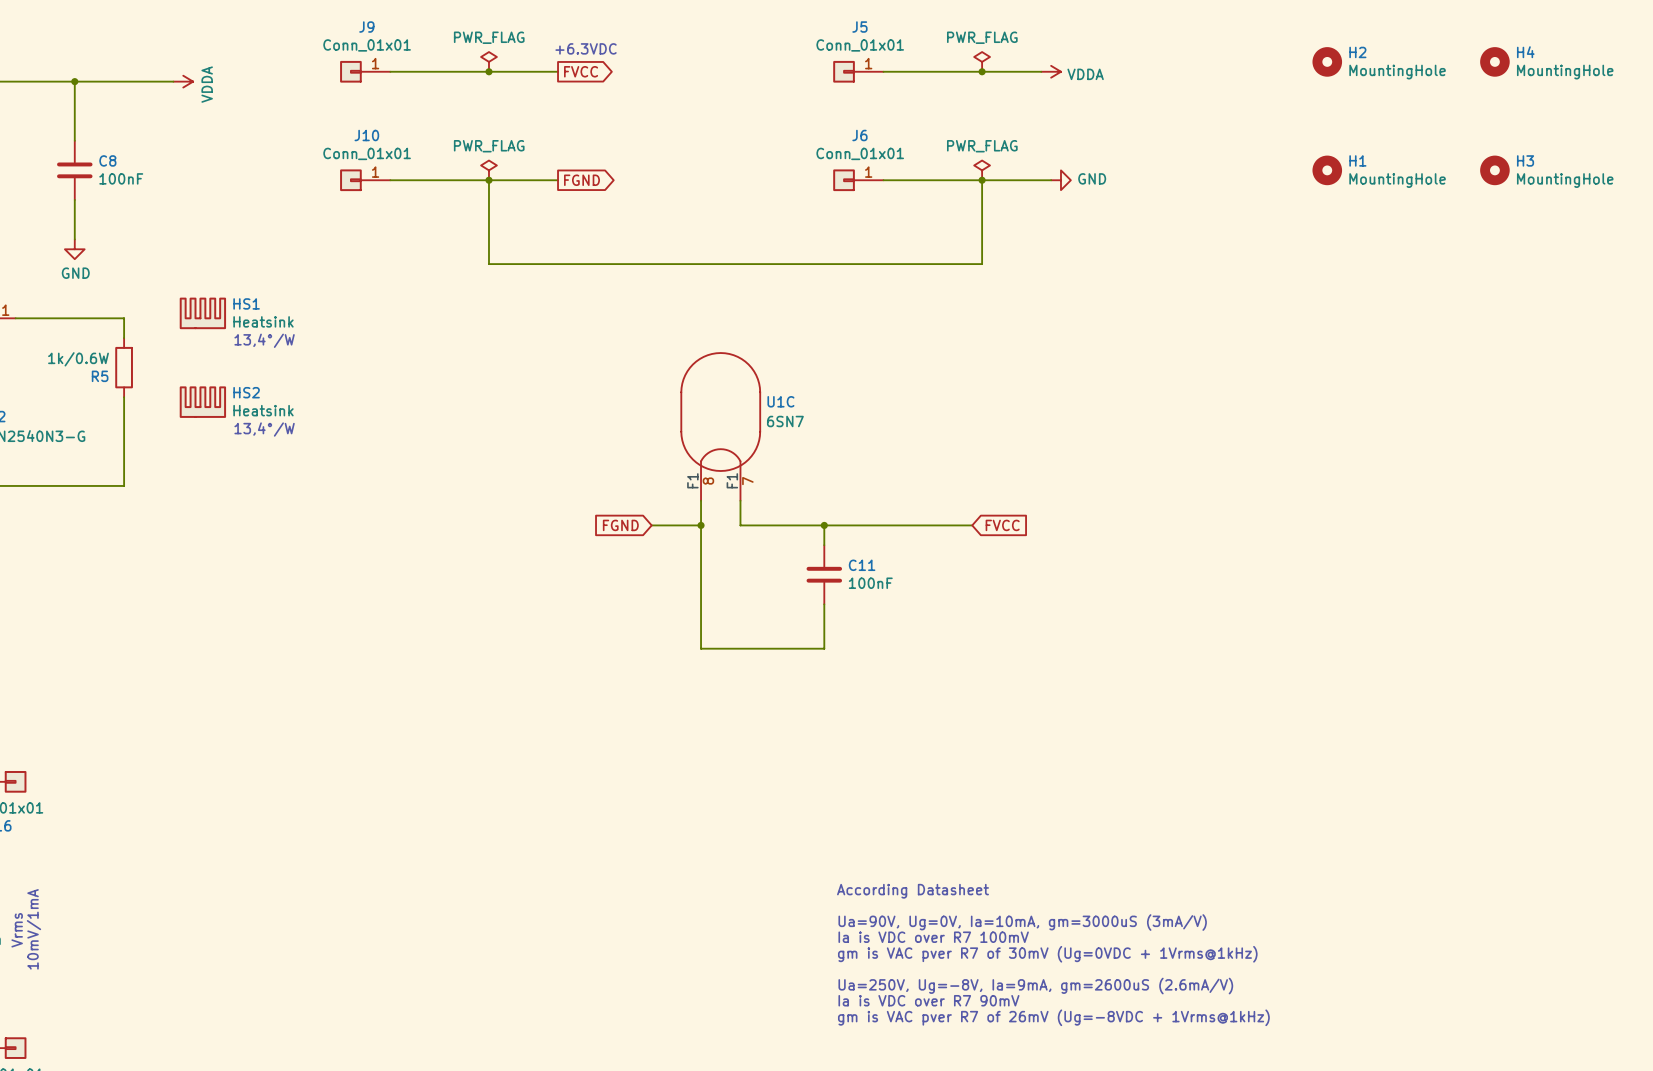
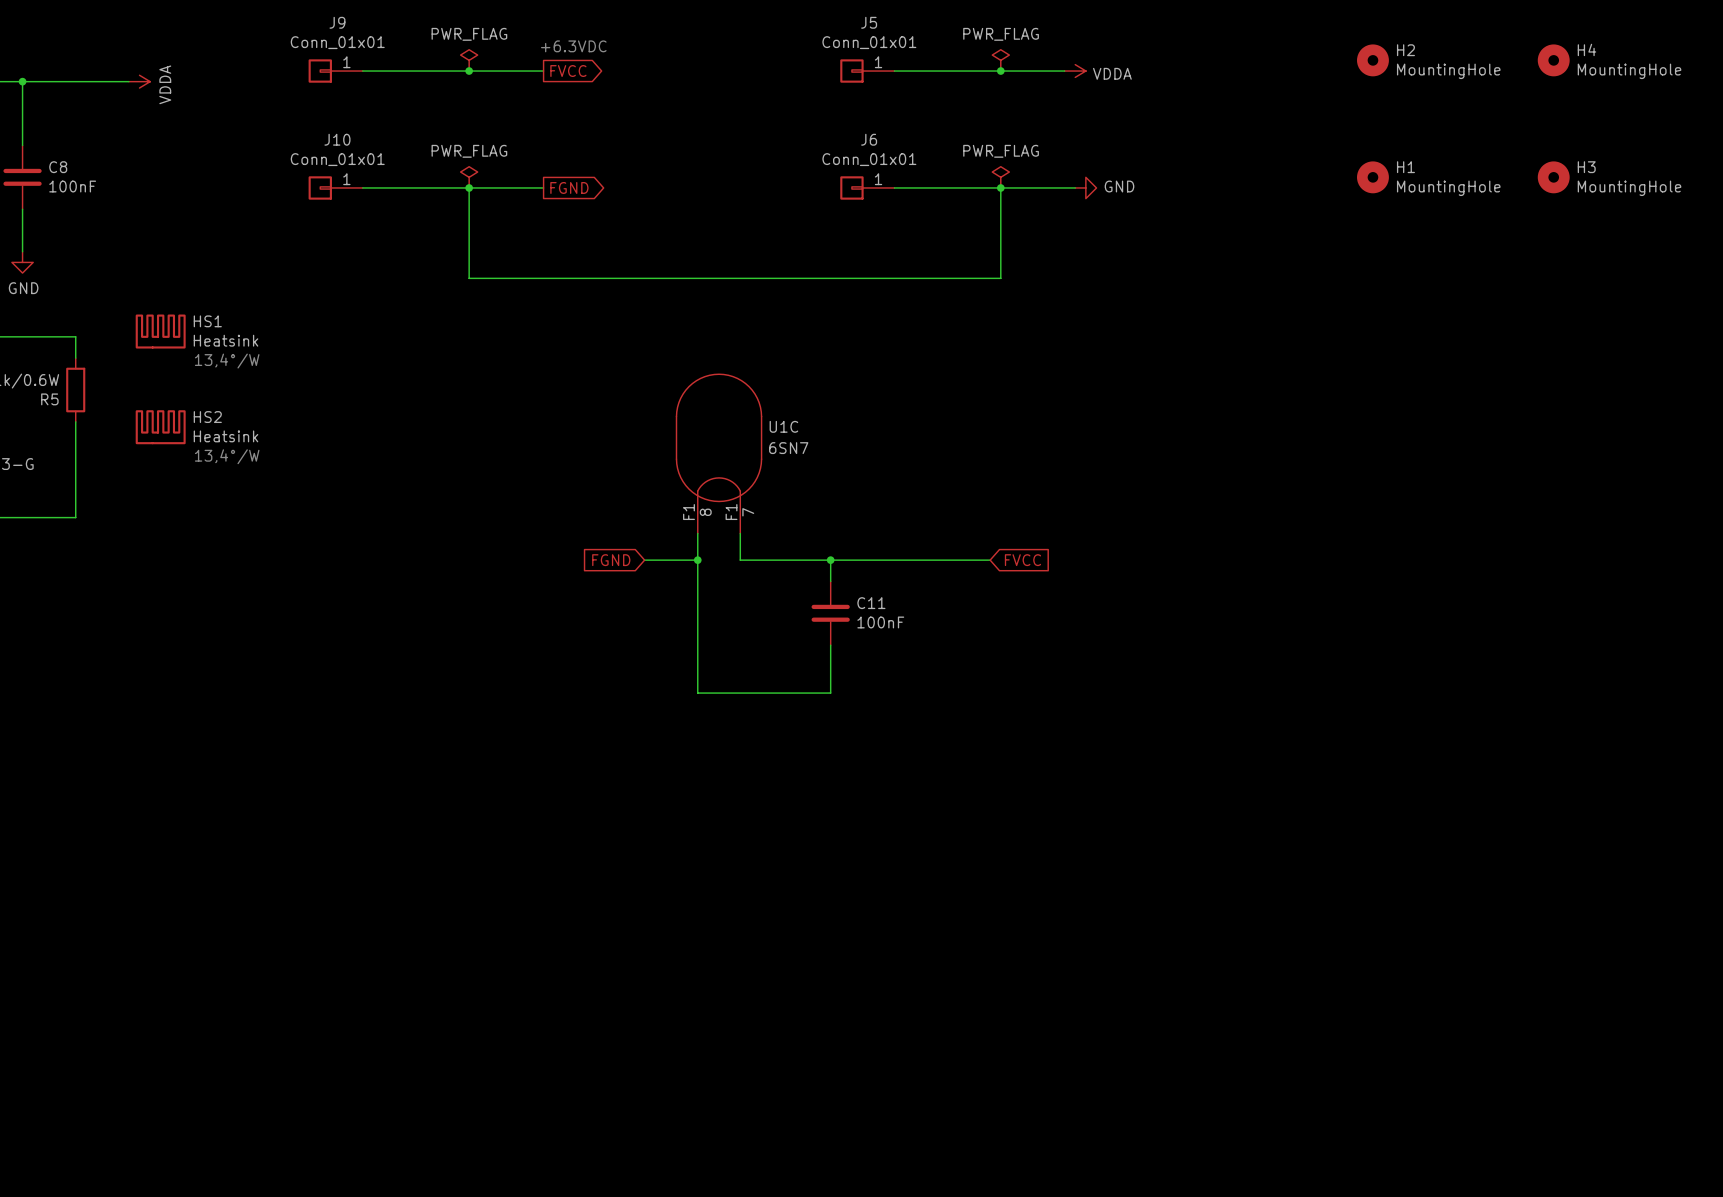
text: According Datasheet (912, 891) -> none
text: Ua=90V, Ug=0V, Ia=10mA, gm=3000uS (3mA/V) (1022, 922) -> none
text: Ia is VDC over R7 100mV (933, 937) -> none
text: gm is VAC pver R7 of 30mV (Ug=0VDC + 1Vrms@1kHz) (1047, 954) -> none
text: Ua=250V, Ug=-8V, Ia=9mA, gm=2600uS (2.6mA/V) (1035, 986) -> none
text: Ia is VDC over R7 90mV (928, 1000) -> none
text: gm is VAC pver R7 of 26mV (Ug=-8VDC + 1Vrms@1kHz) (1053, 1017) -> none

